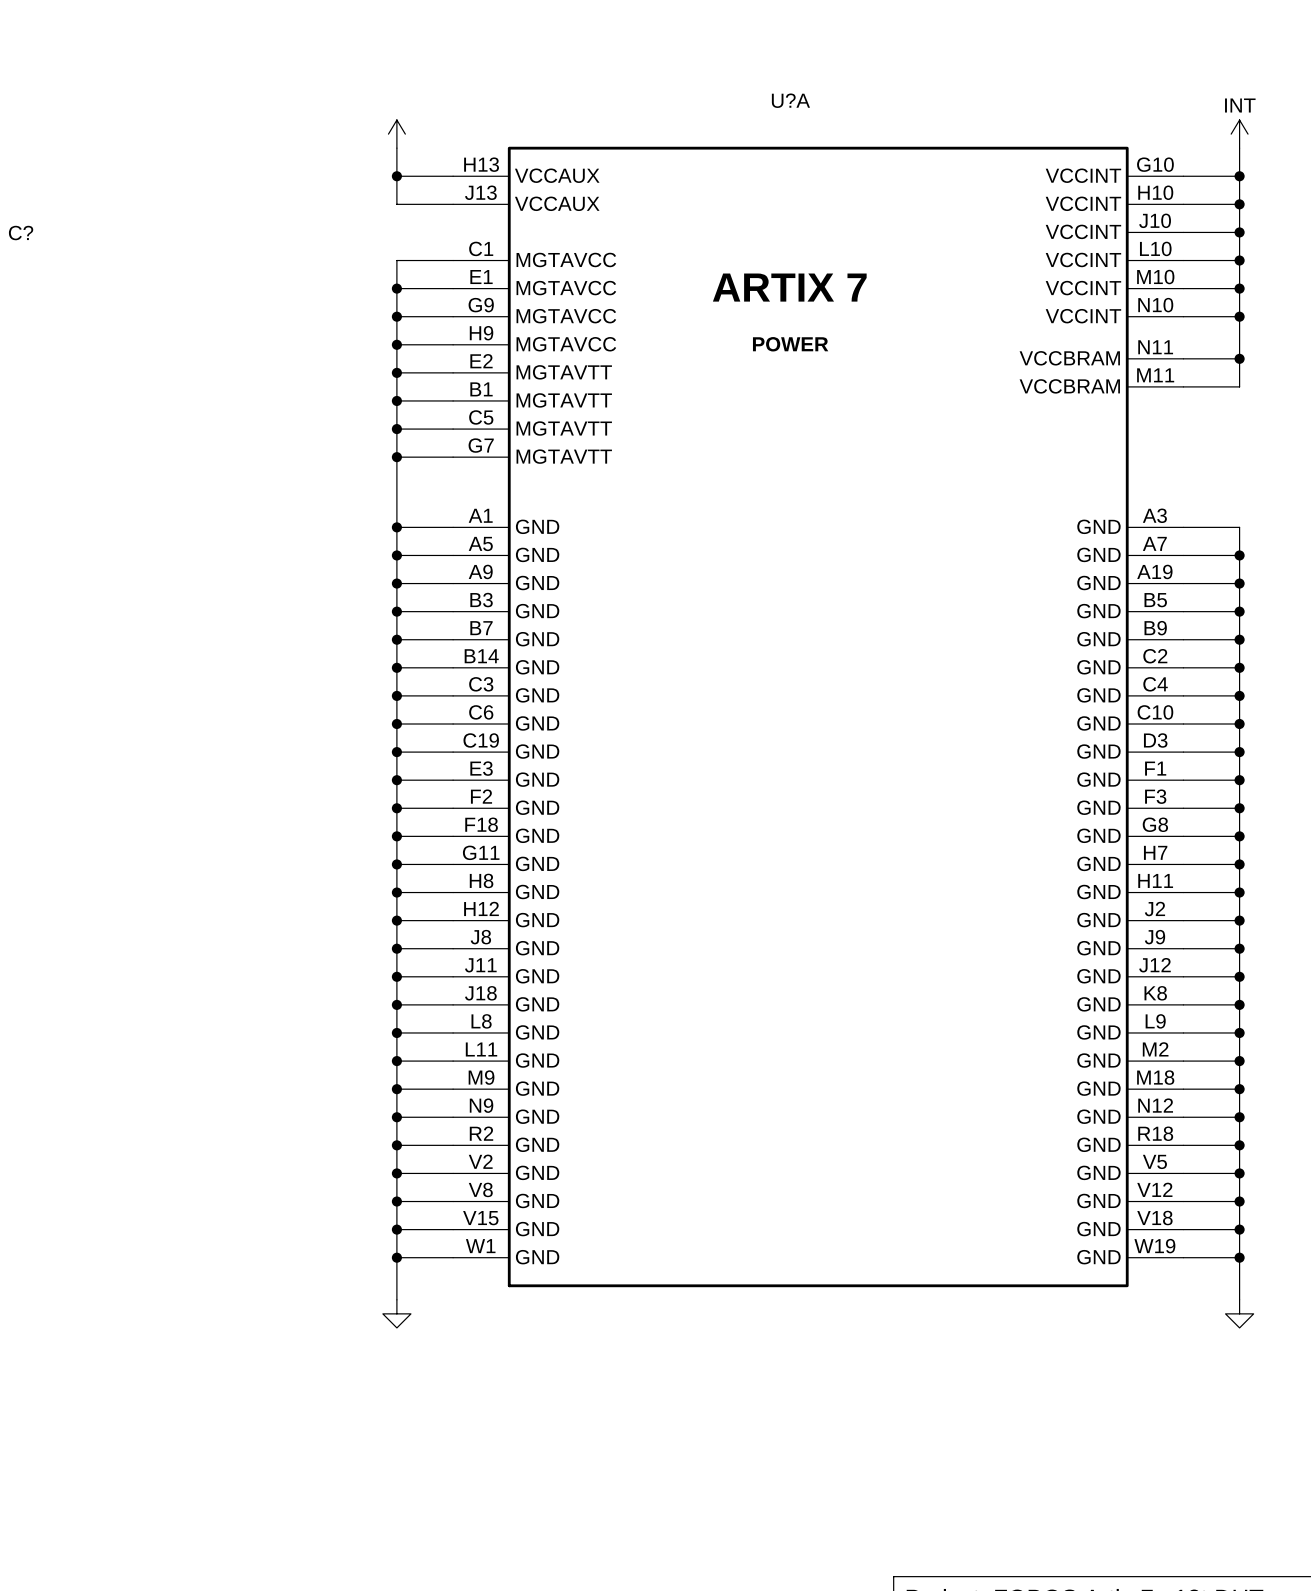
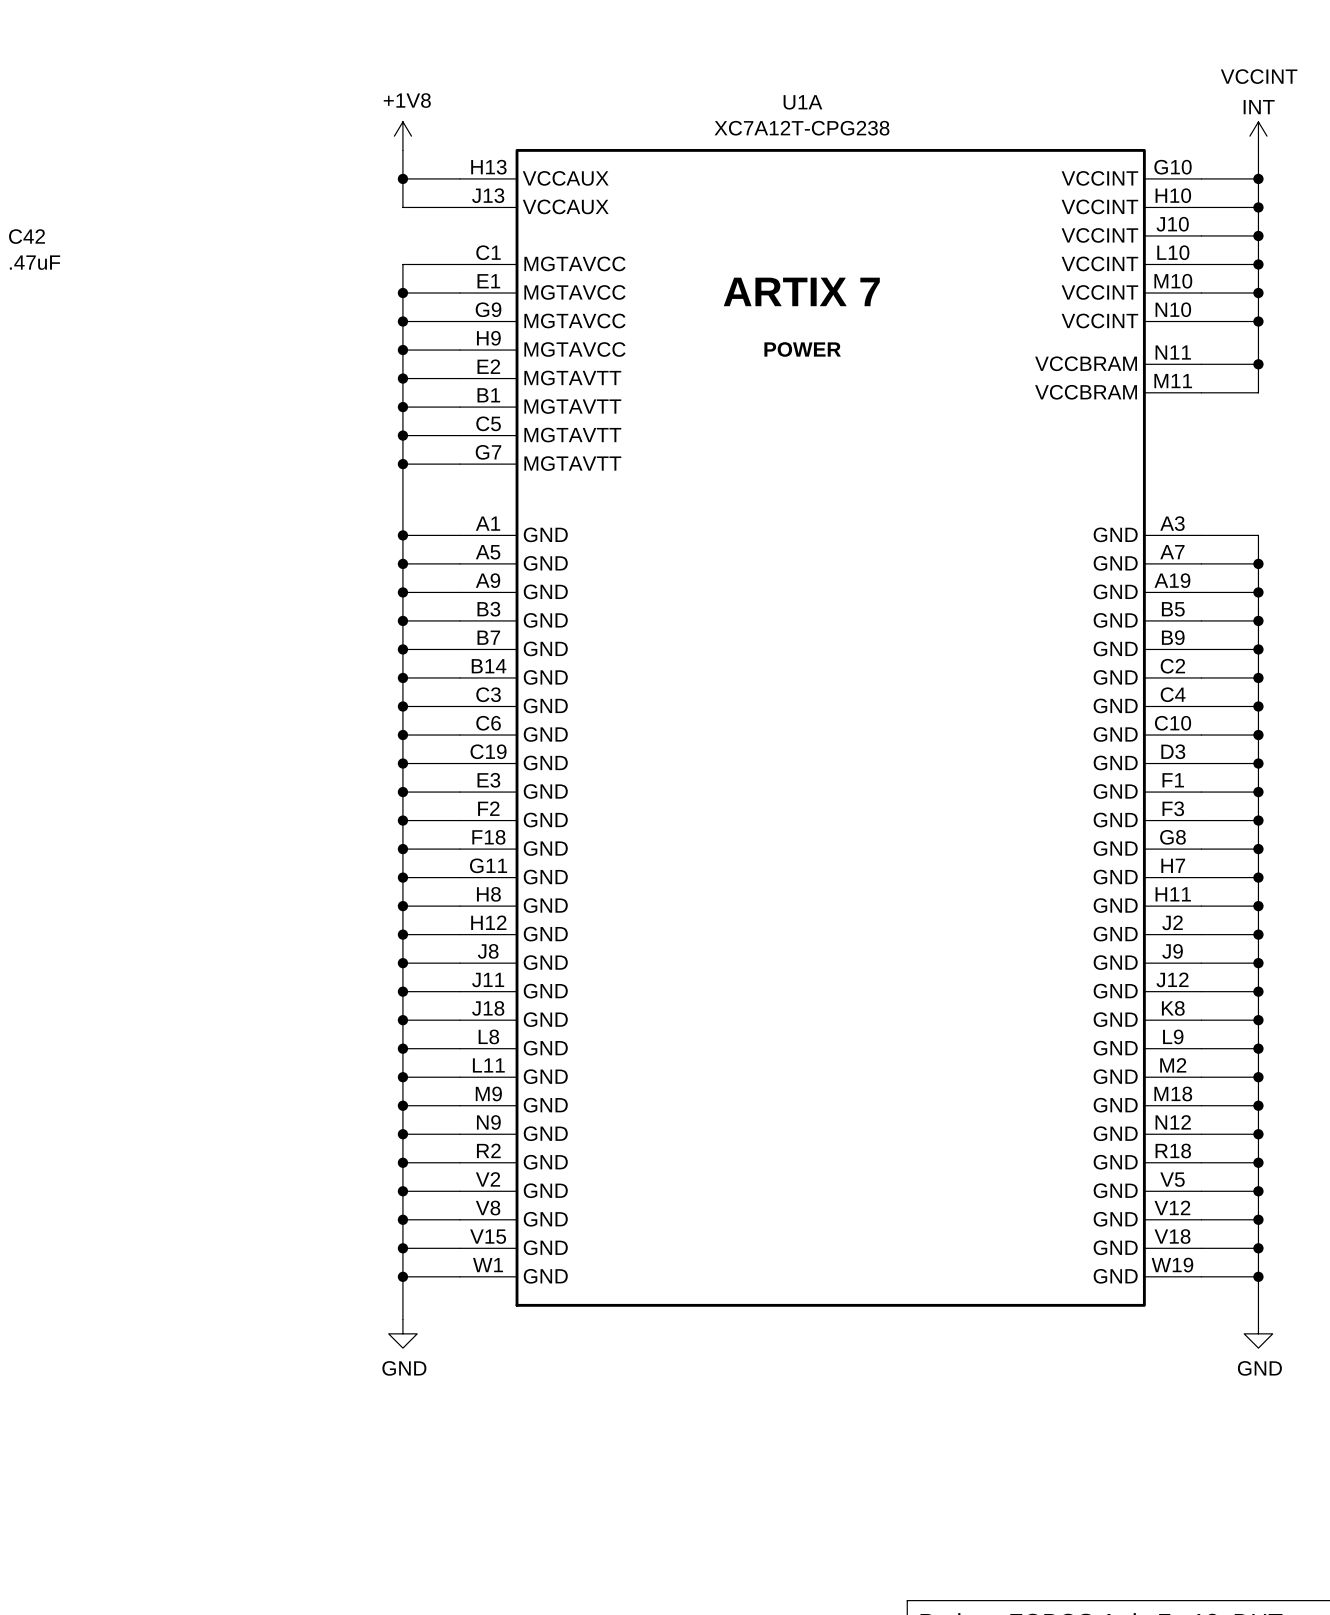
power symbol text: none -> VCCINT (1259, 76)
power symbol text: none -> +1V8 (407, 100)
U?A name: U?A (790, 100) -> U1A (802, 102)
U?A value: none -> XC7A12T-CPG238 (801, 128)
C? name: C? (21, 233) -> C42 (27, 236)
C? value: none -> .47uF (35, 262)
power symbol text: none -> GND (404, 1368)
power symbol text: none -> GND (1259, 1368)

